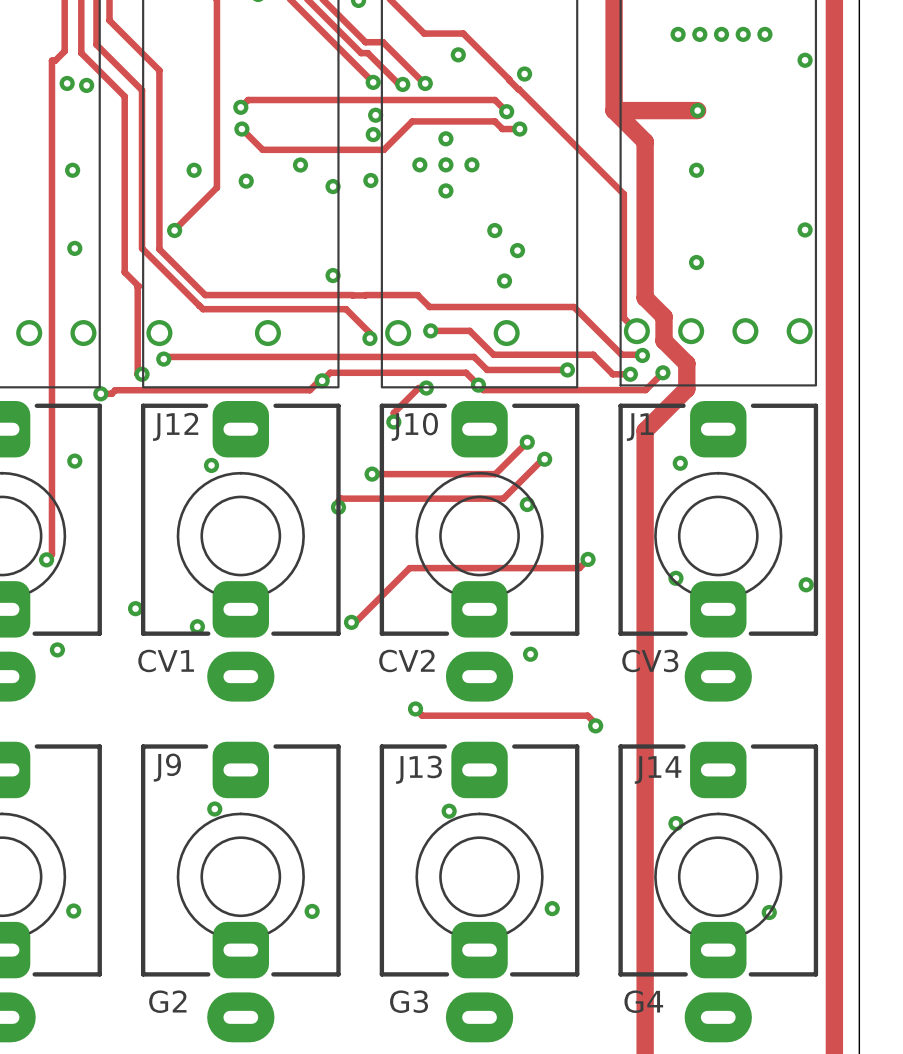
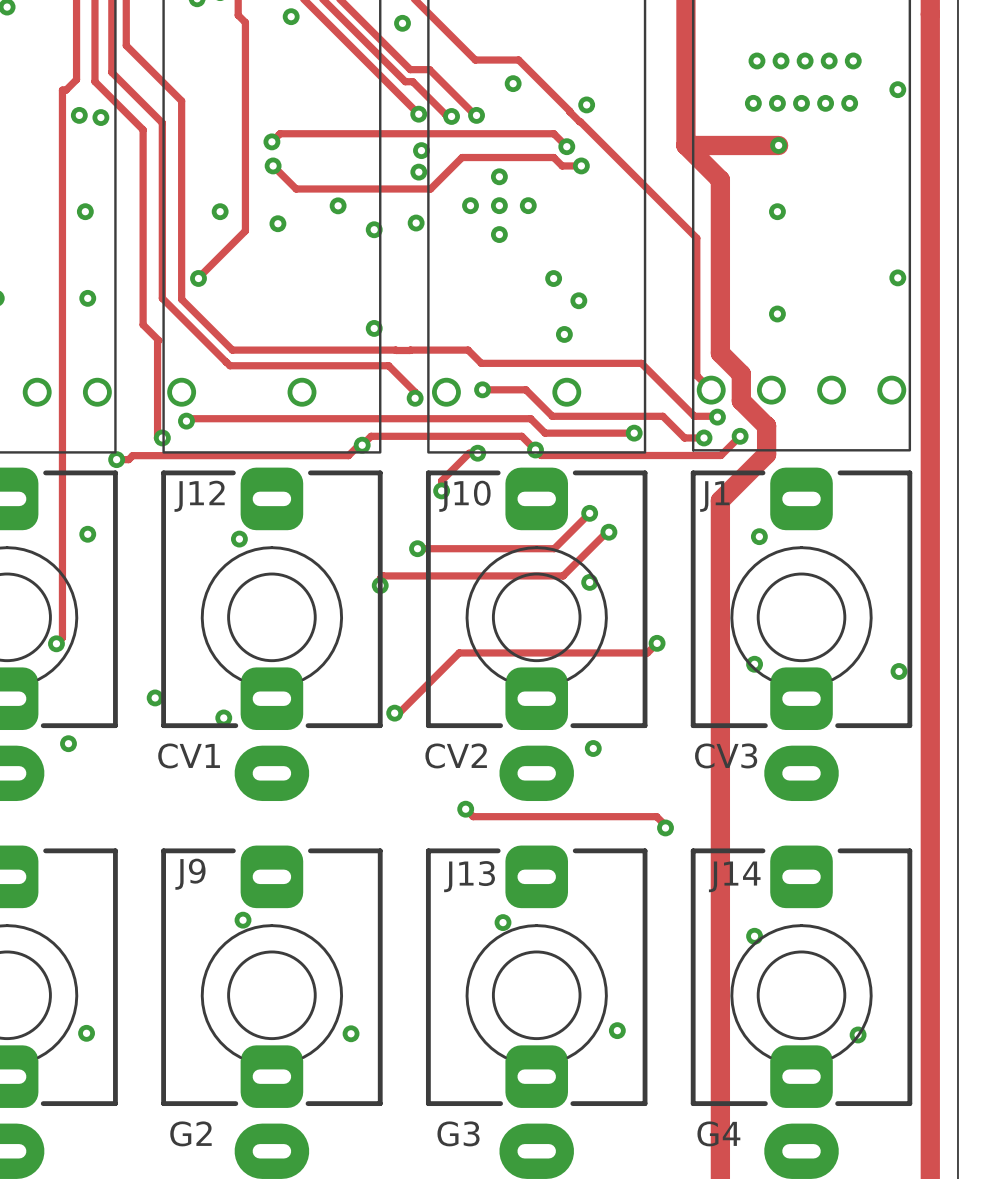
via: none -> (753, 103)
via: none -> (777, 103)
via: none -> (801, 103)
via: none -> (825, 103)
via: none -> (849, 103)

